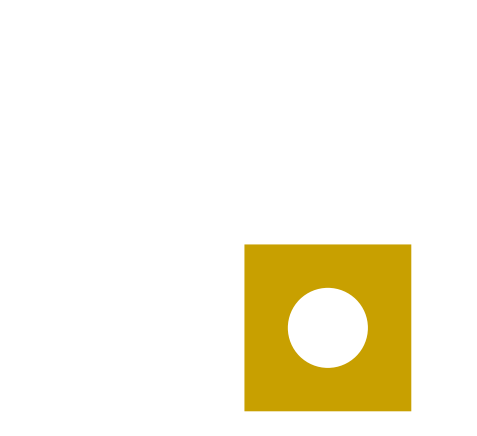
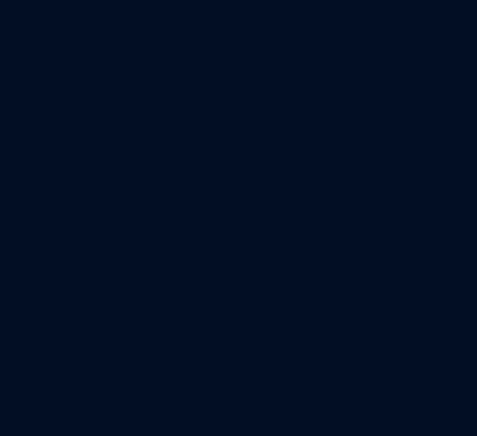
part: (327, 327) -> none

